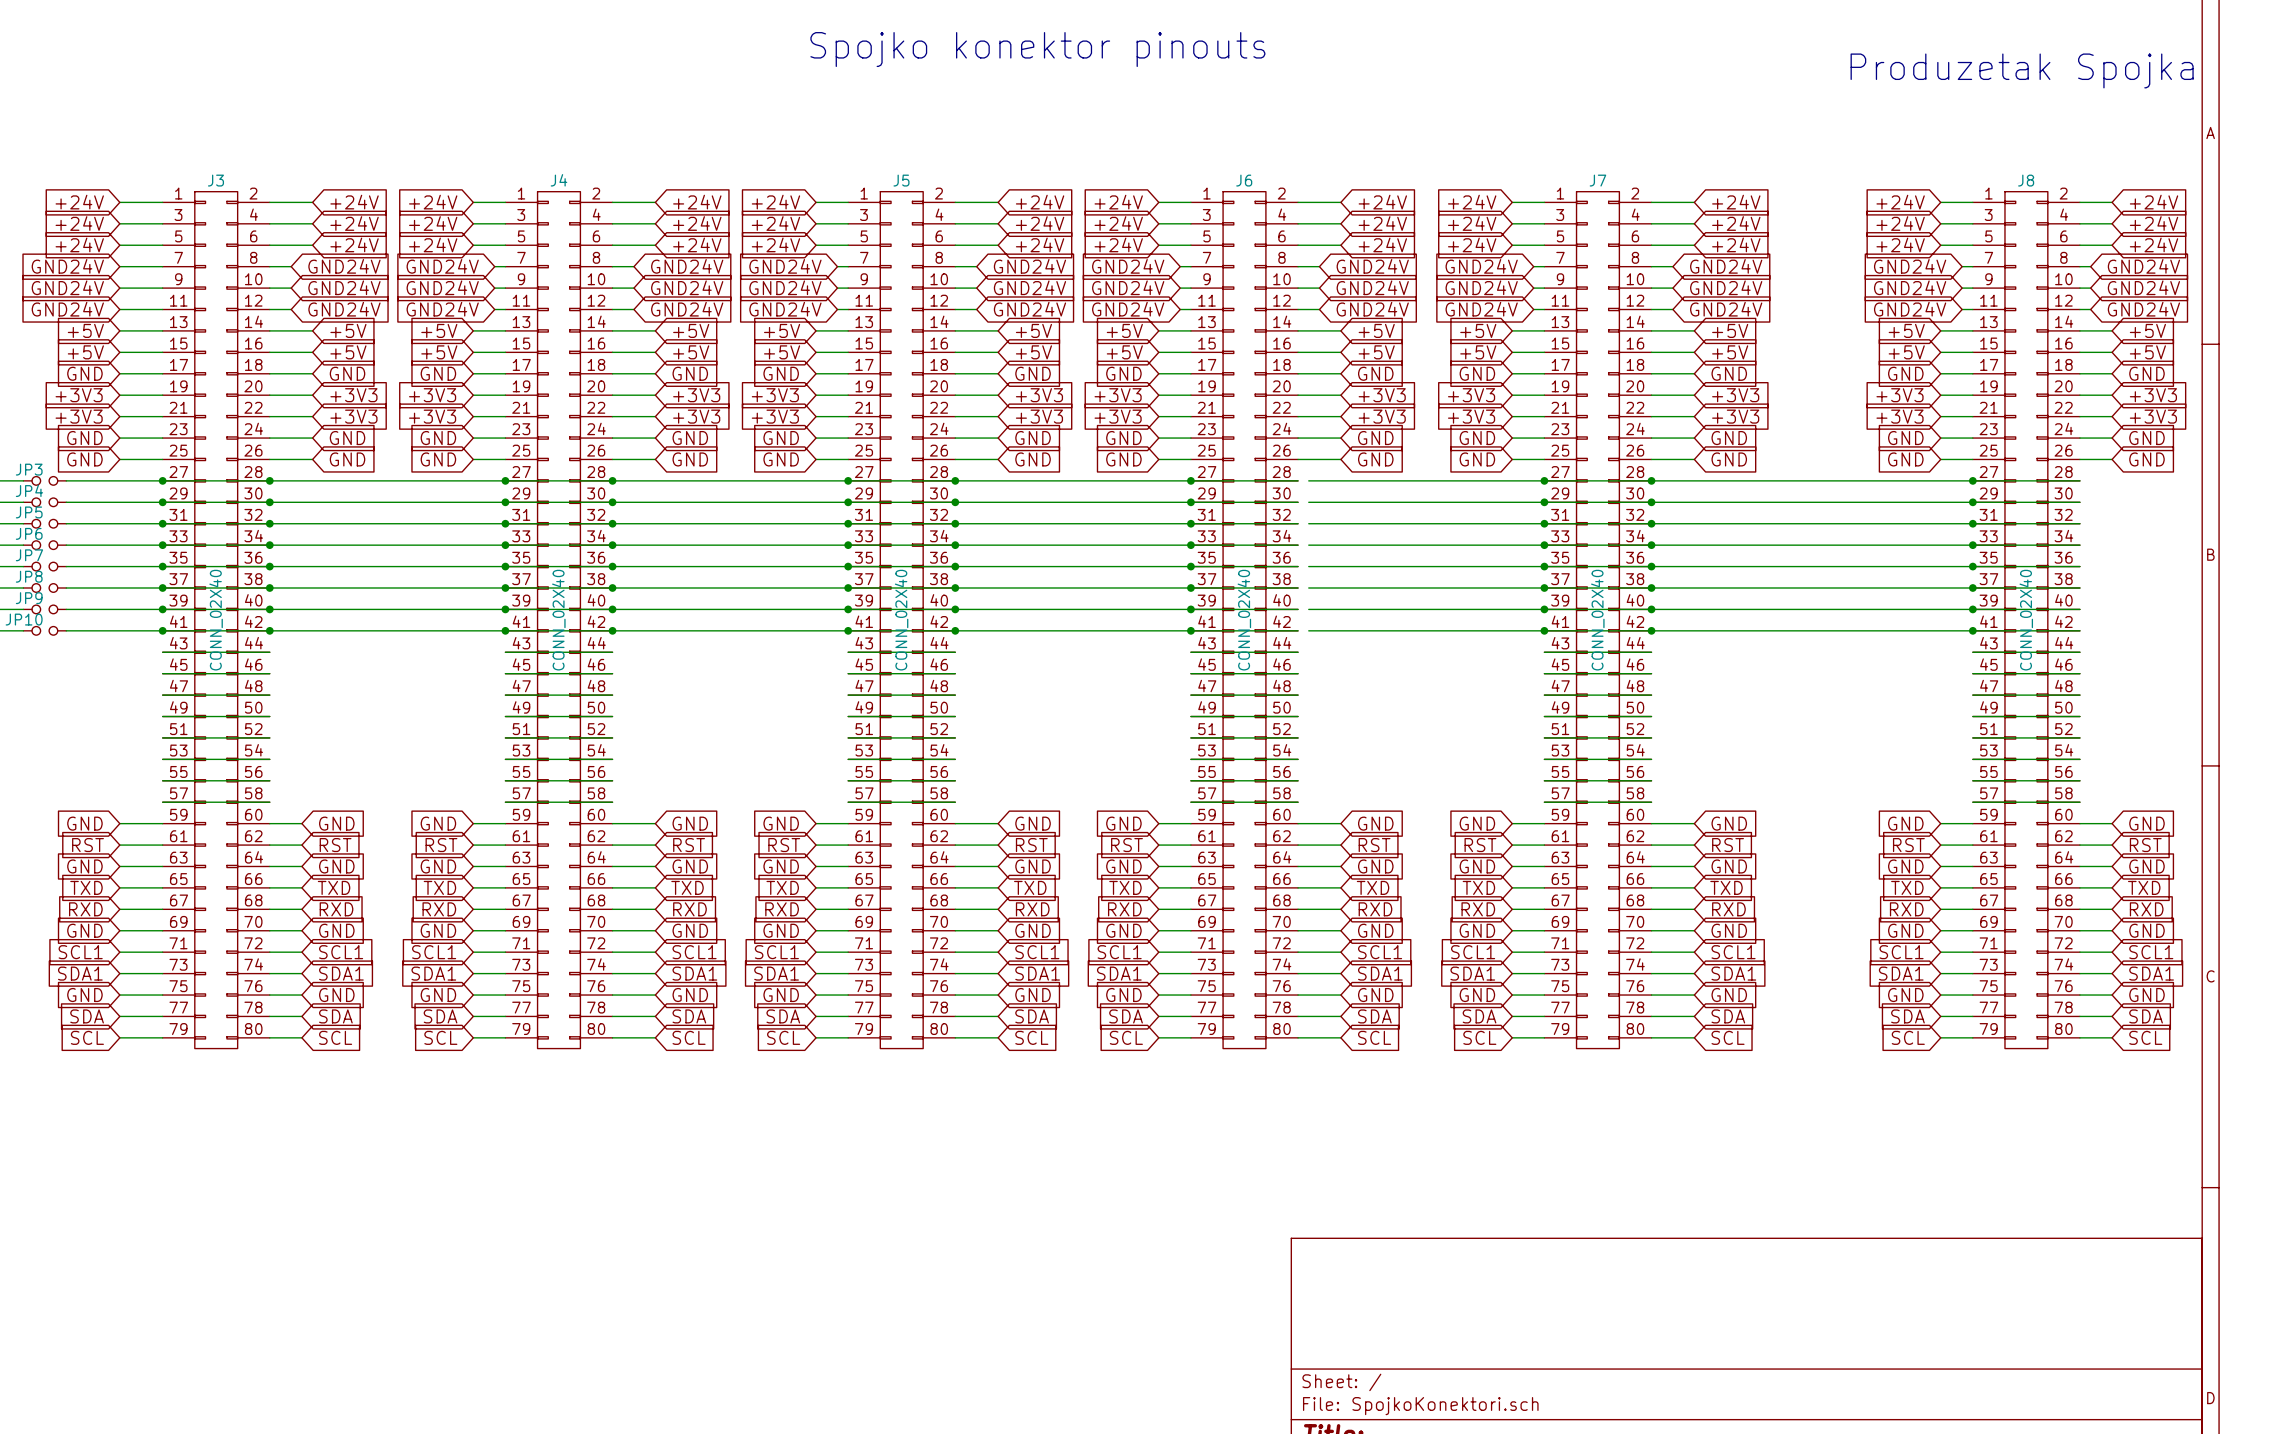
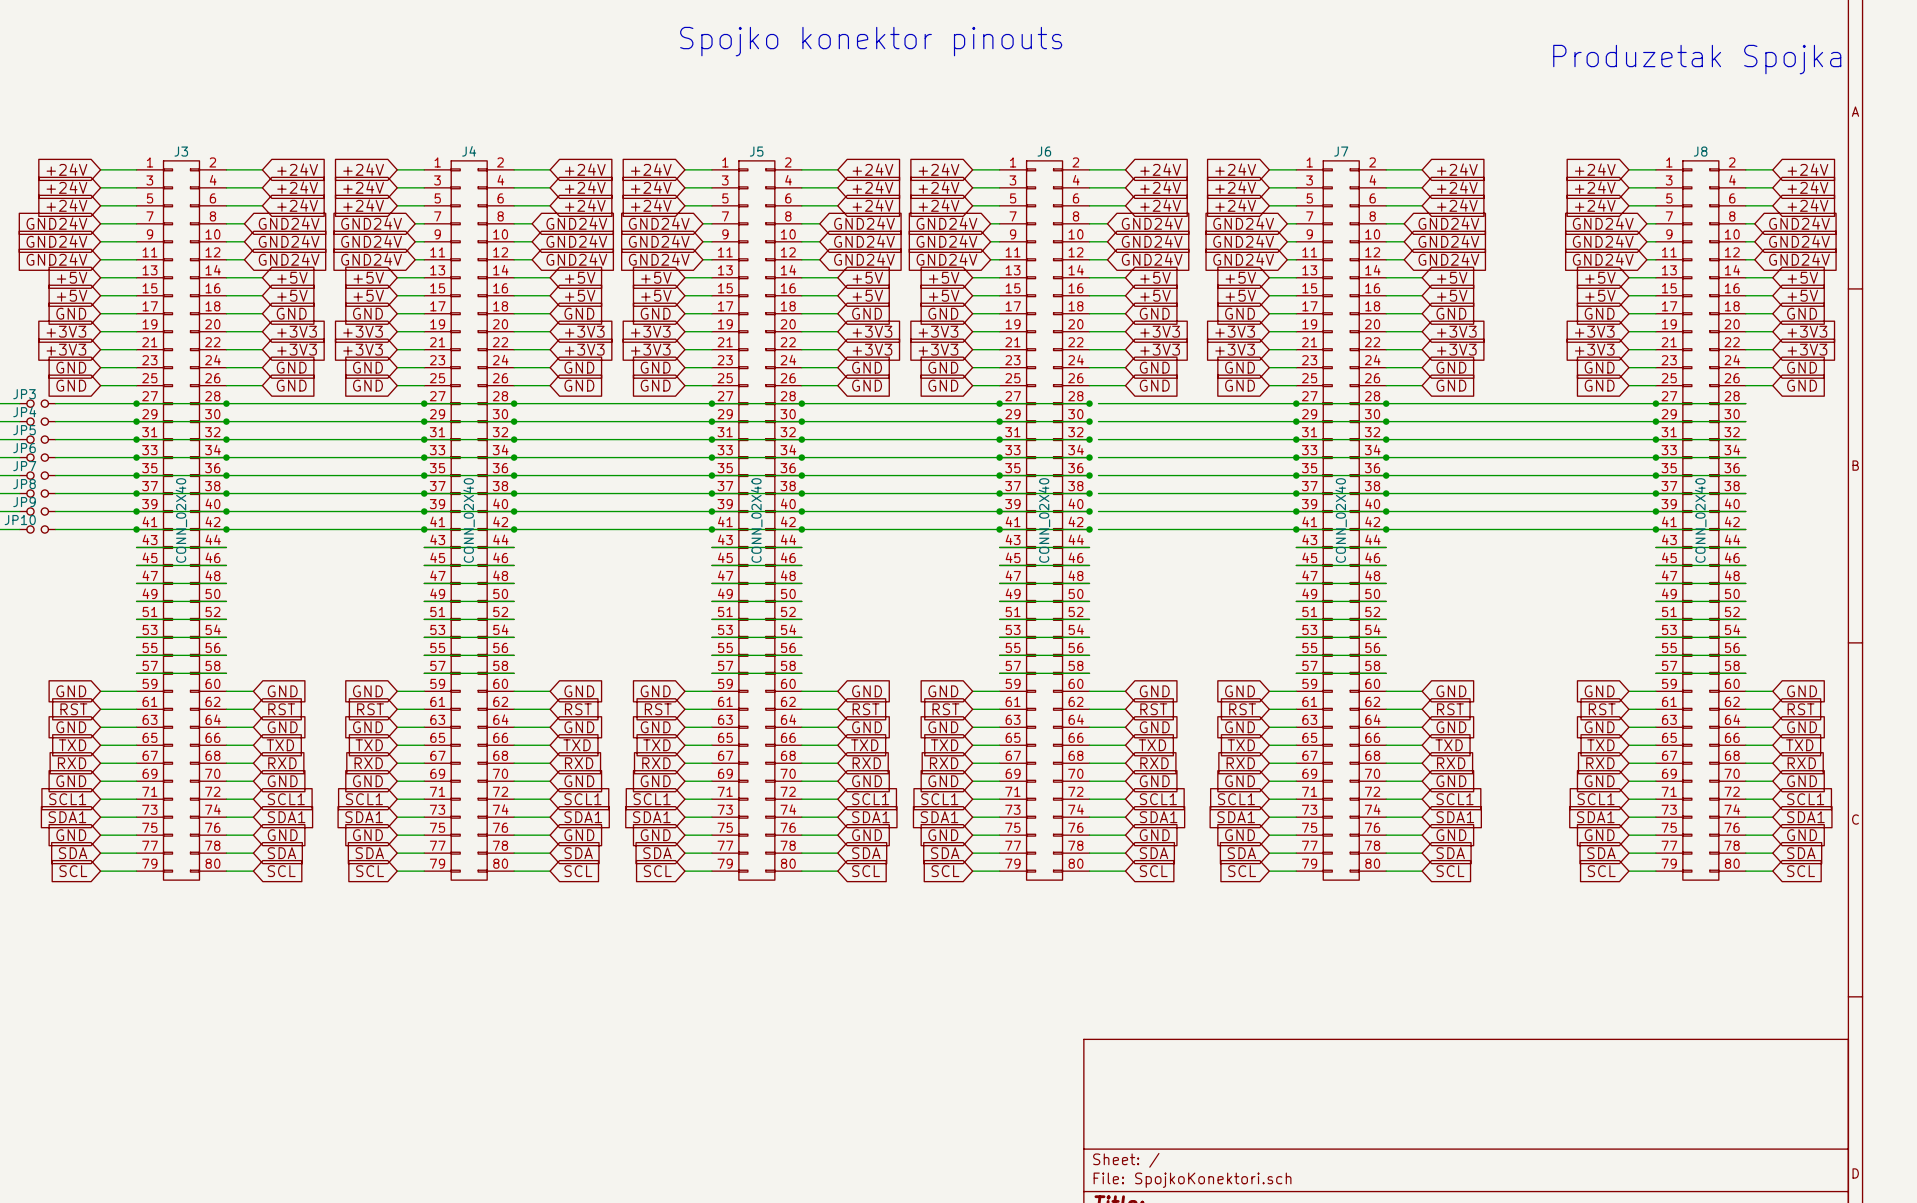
junction: none -> (1089, 403)
junction: none -> (1089, 421)
junction: none -> (1089, 439)
junction: none -> (1089, 457)
junction: none -> (1089, 475)
junction: none -> (1089, 493)
junction: none -> (1089, 511)
junction: none -> (1089, 529)

